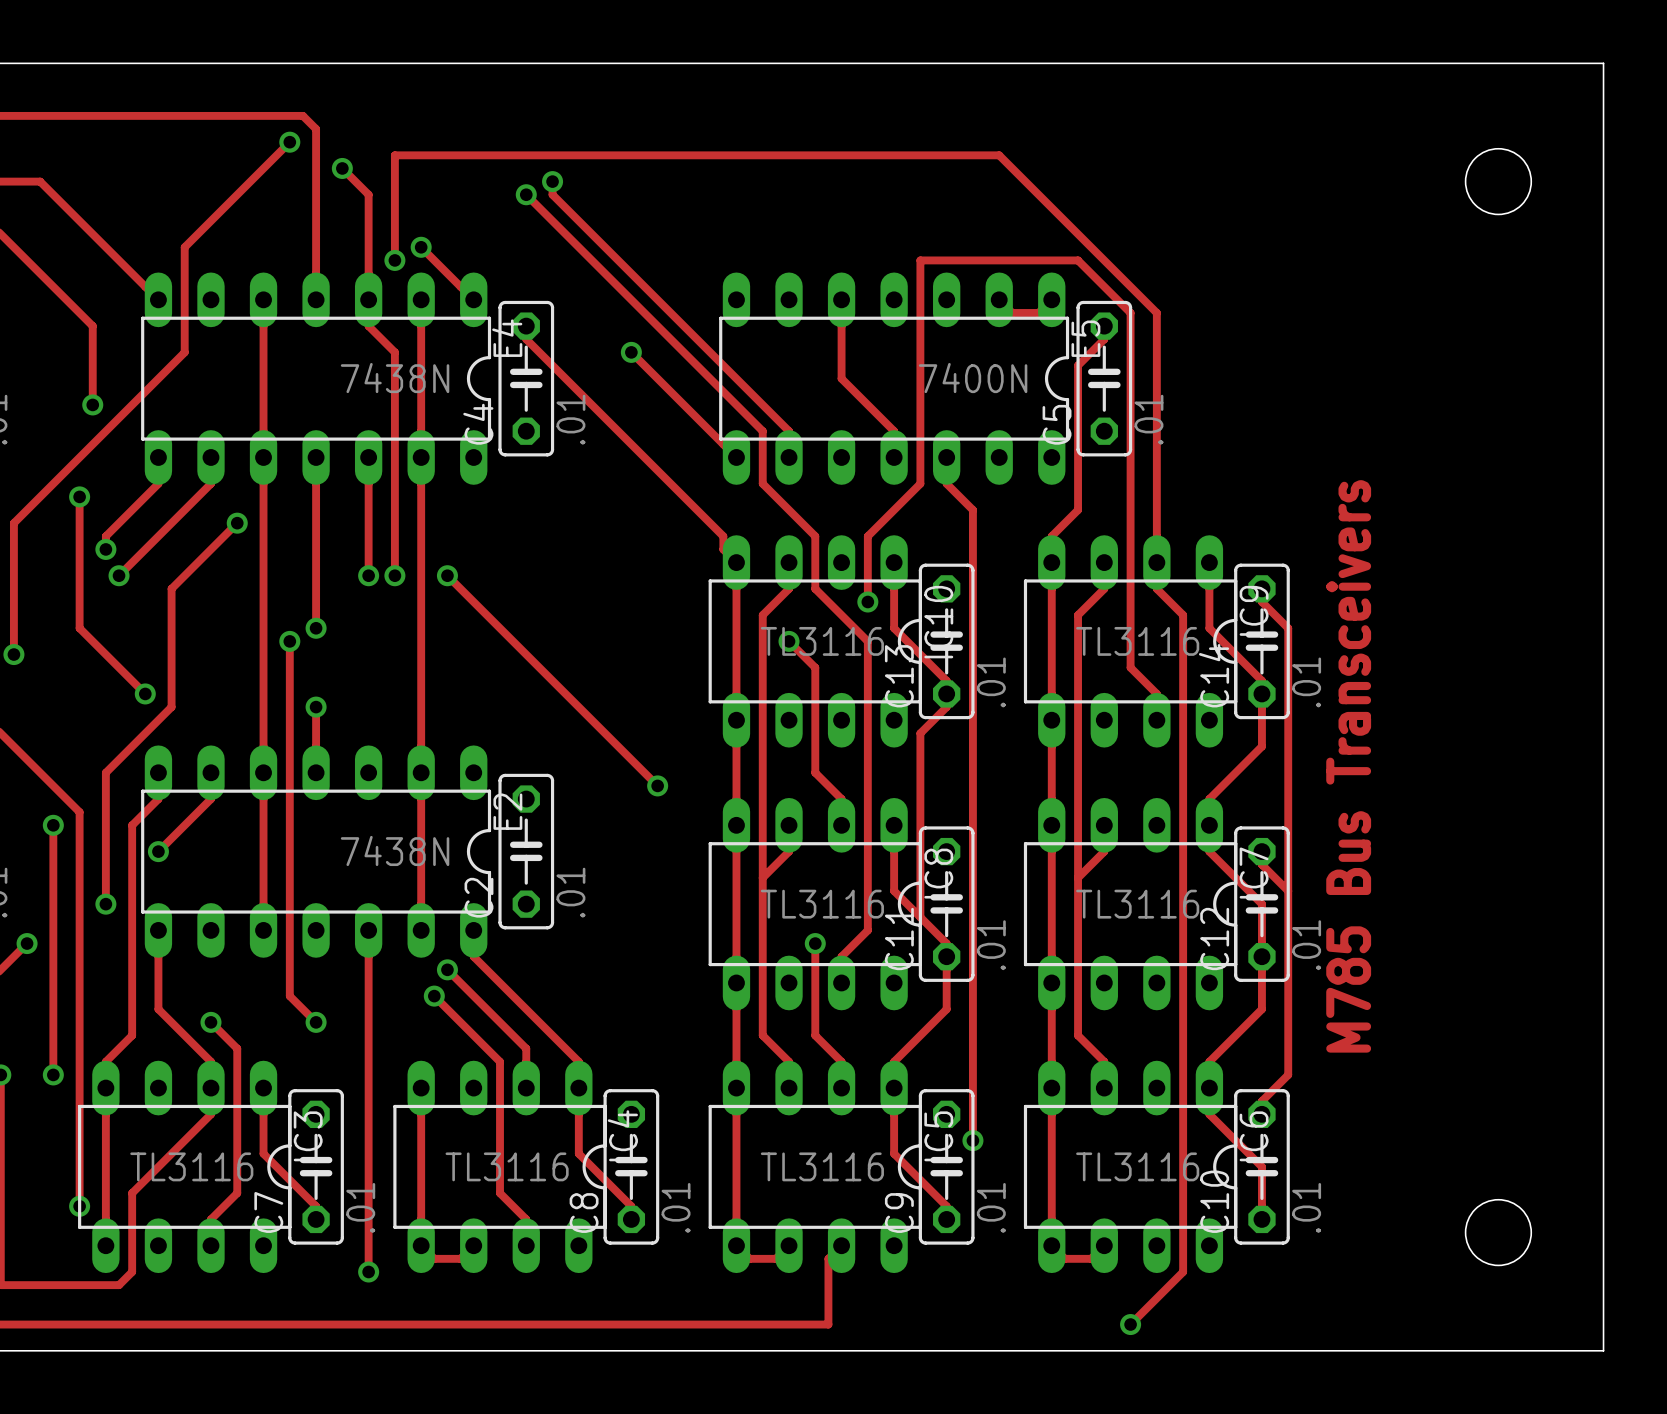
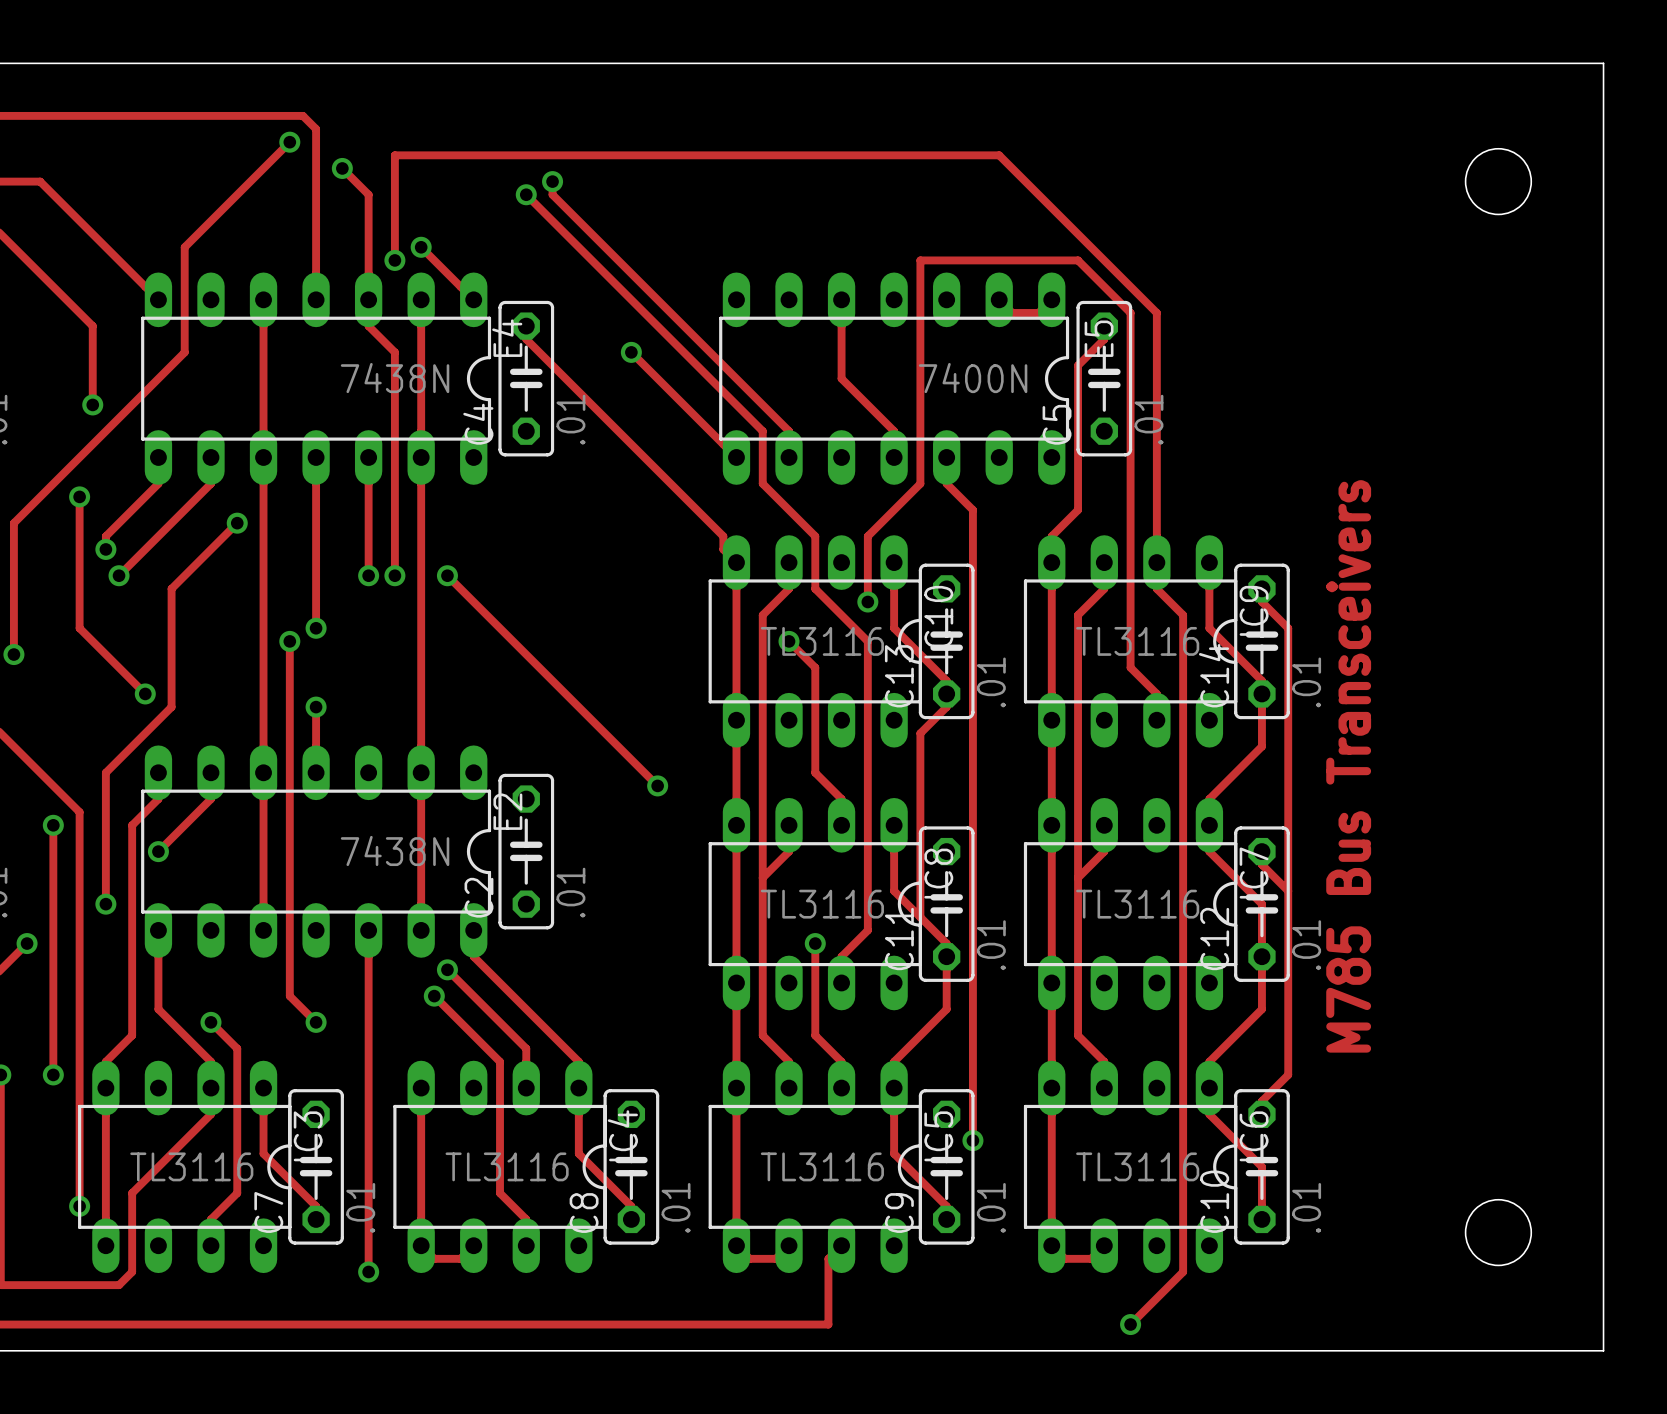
E5 name position: E5 (1085, 338) -> E5 (1099, 338)

